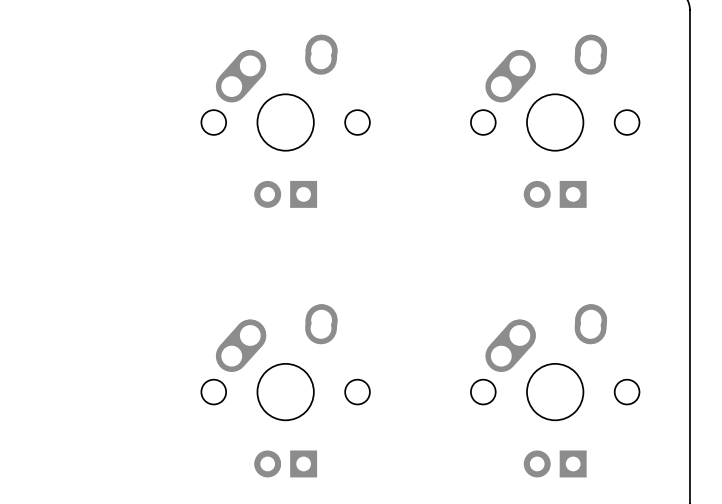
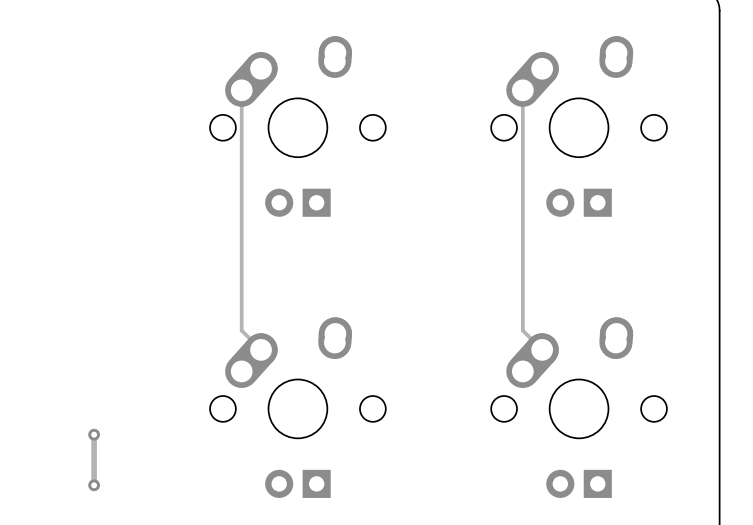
track: none -> (241, 90) (241, 330) (261, 349)
track: none -> (522, 90) (522, 330) (542, 349)
track: none -> (94, 434) (94, 485)
via: none -> (94, 434)
via: none -> (94, 485)

